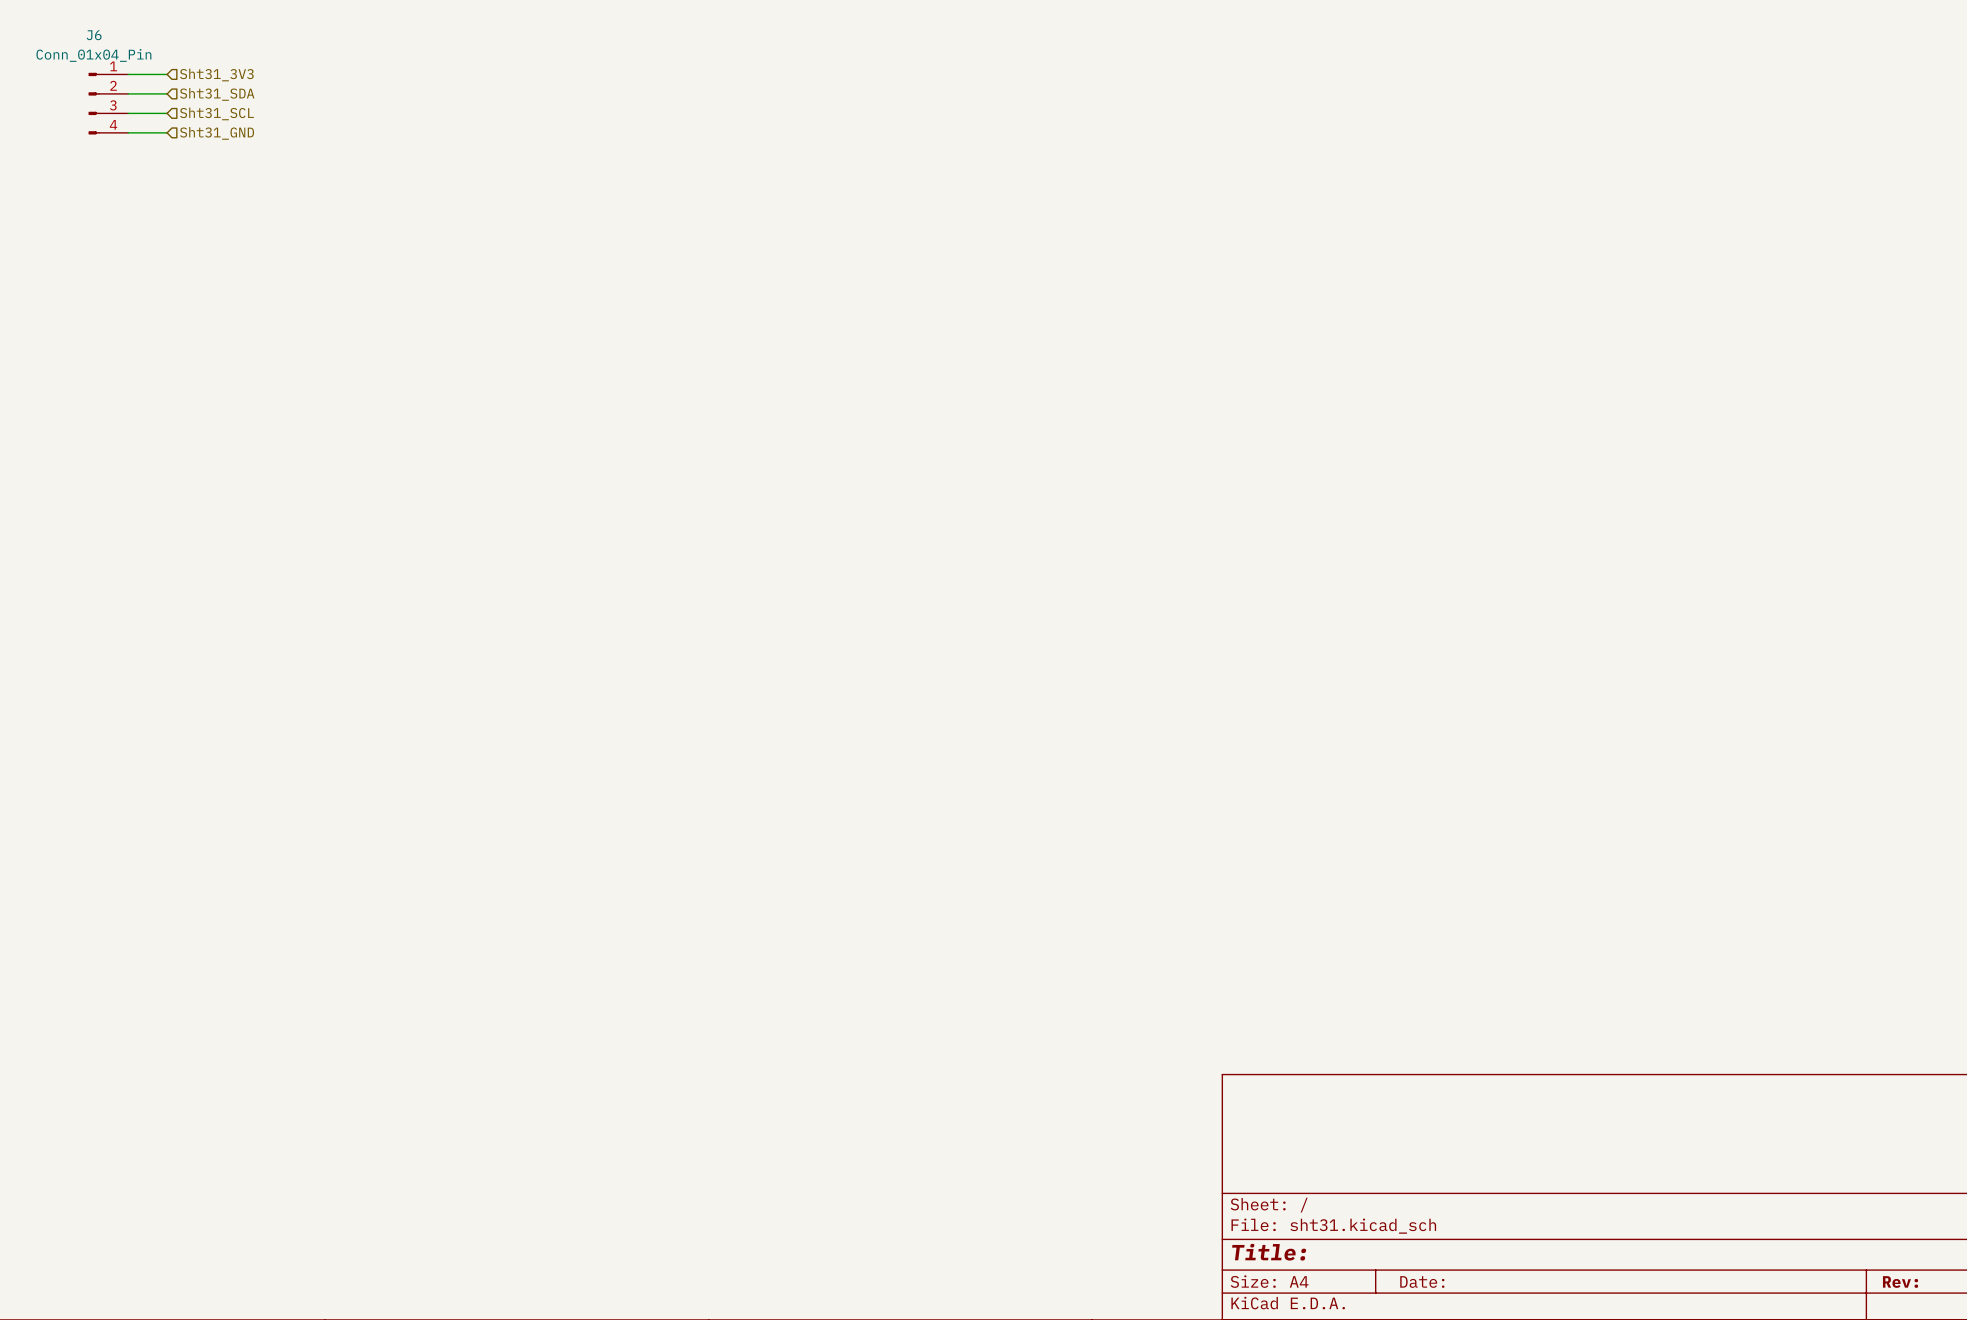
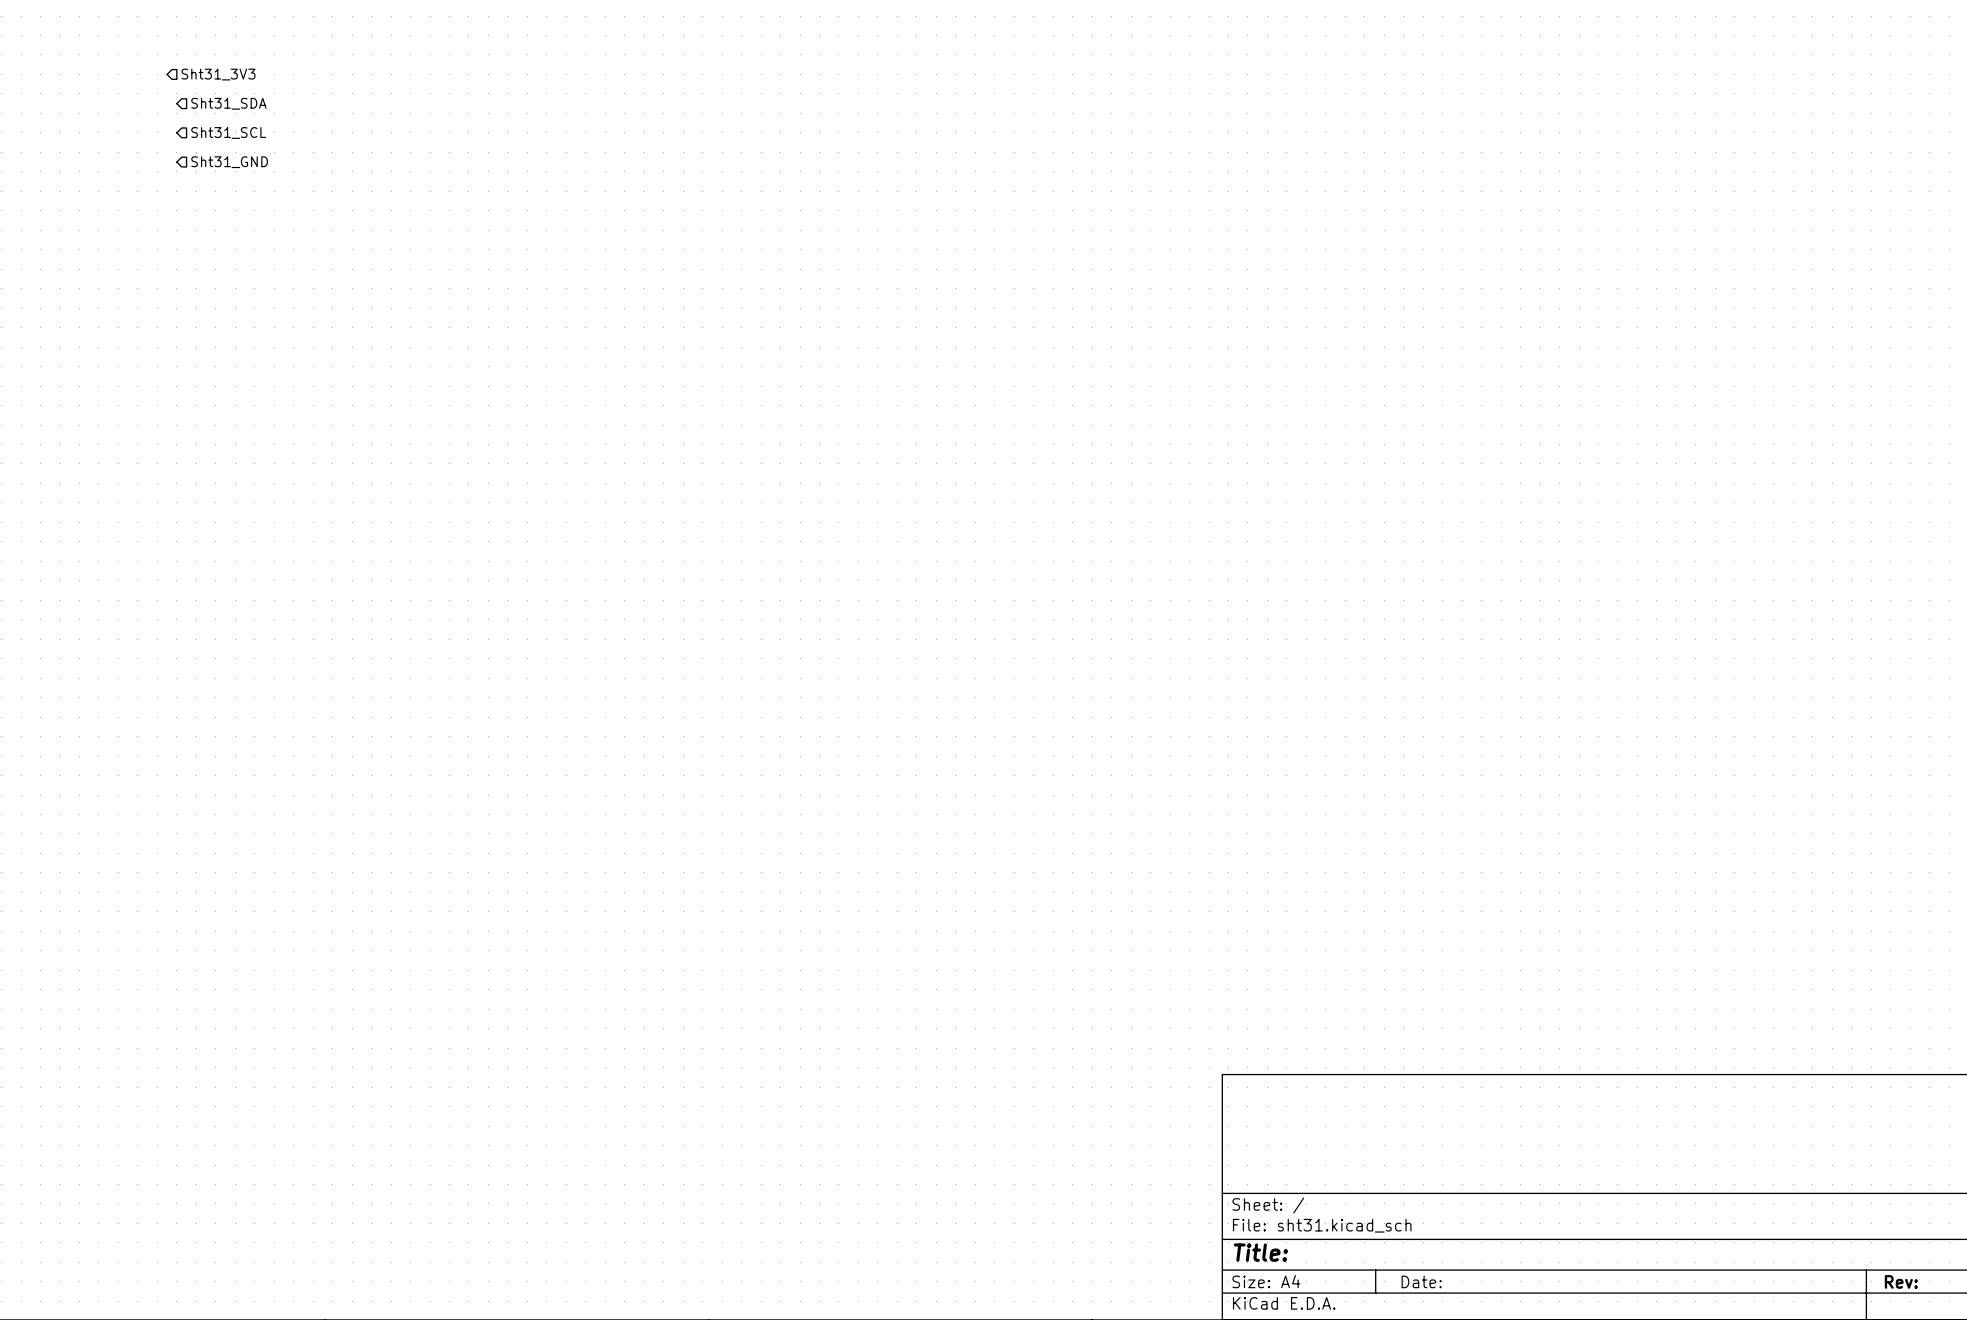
wire: (128, 74) (167, 74) -> none
wire: (128, 93) (167, 93) -> none
hierarchical label position: Sht31_SDA (217, 94) -> Sht31_SDA (228, 103)
J6: Conn_01x04_Pin (108, 103) -> none
wire: (128, 113) (167, 113) -> none
hierarchical label position: Sht31_SCL (217, 113) -> Sht31_SCL (228, 132)
wire: (128, 132) (167, 132) -> none
hierarchical label position: Sht31_GND (217, 133) -> Sht31_GND (229, 162)

